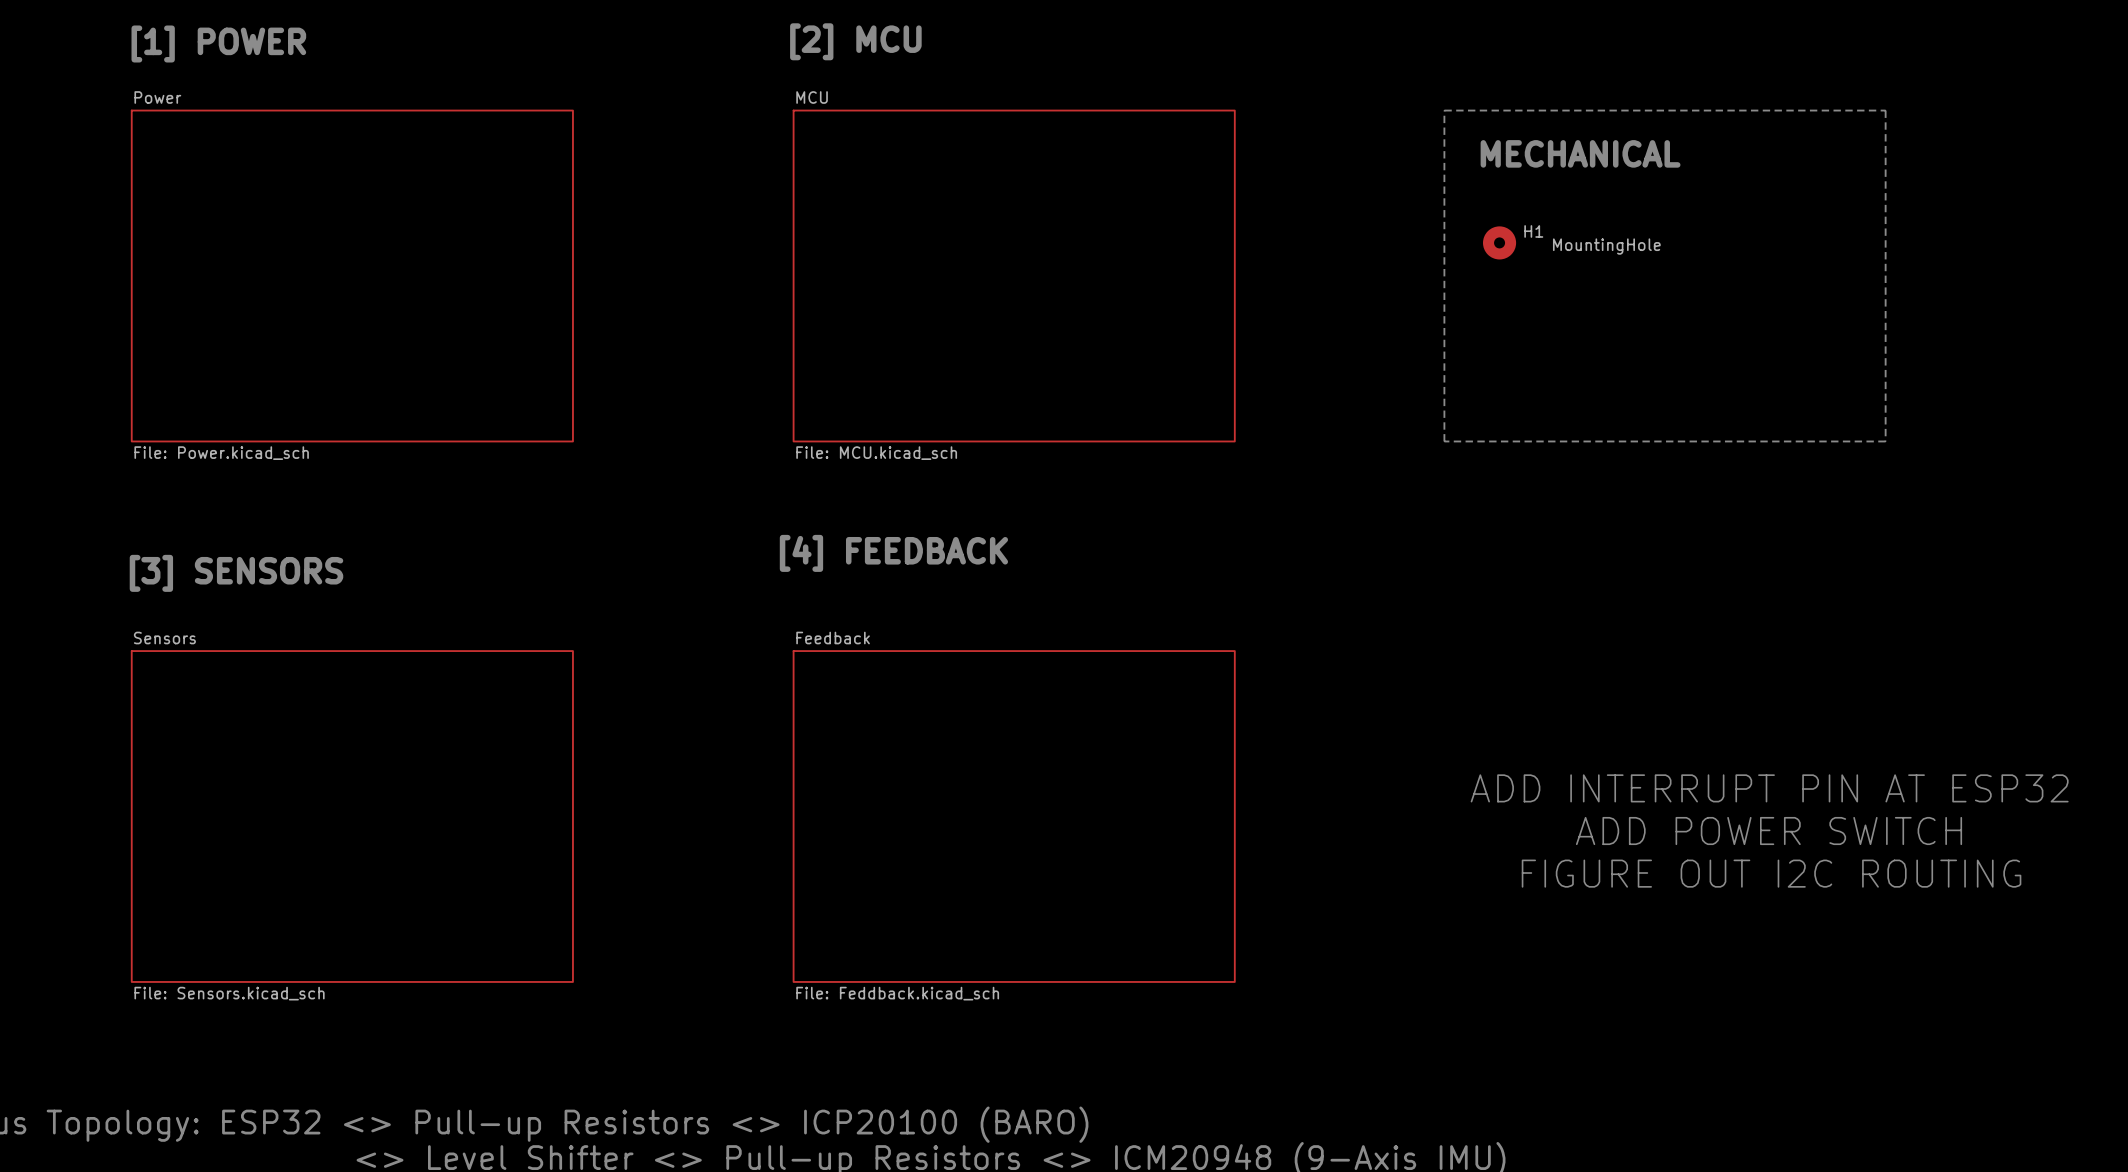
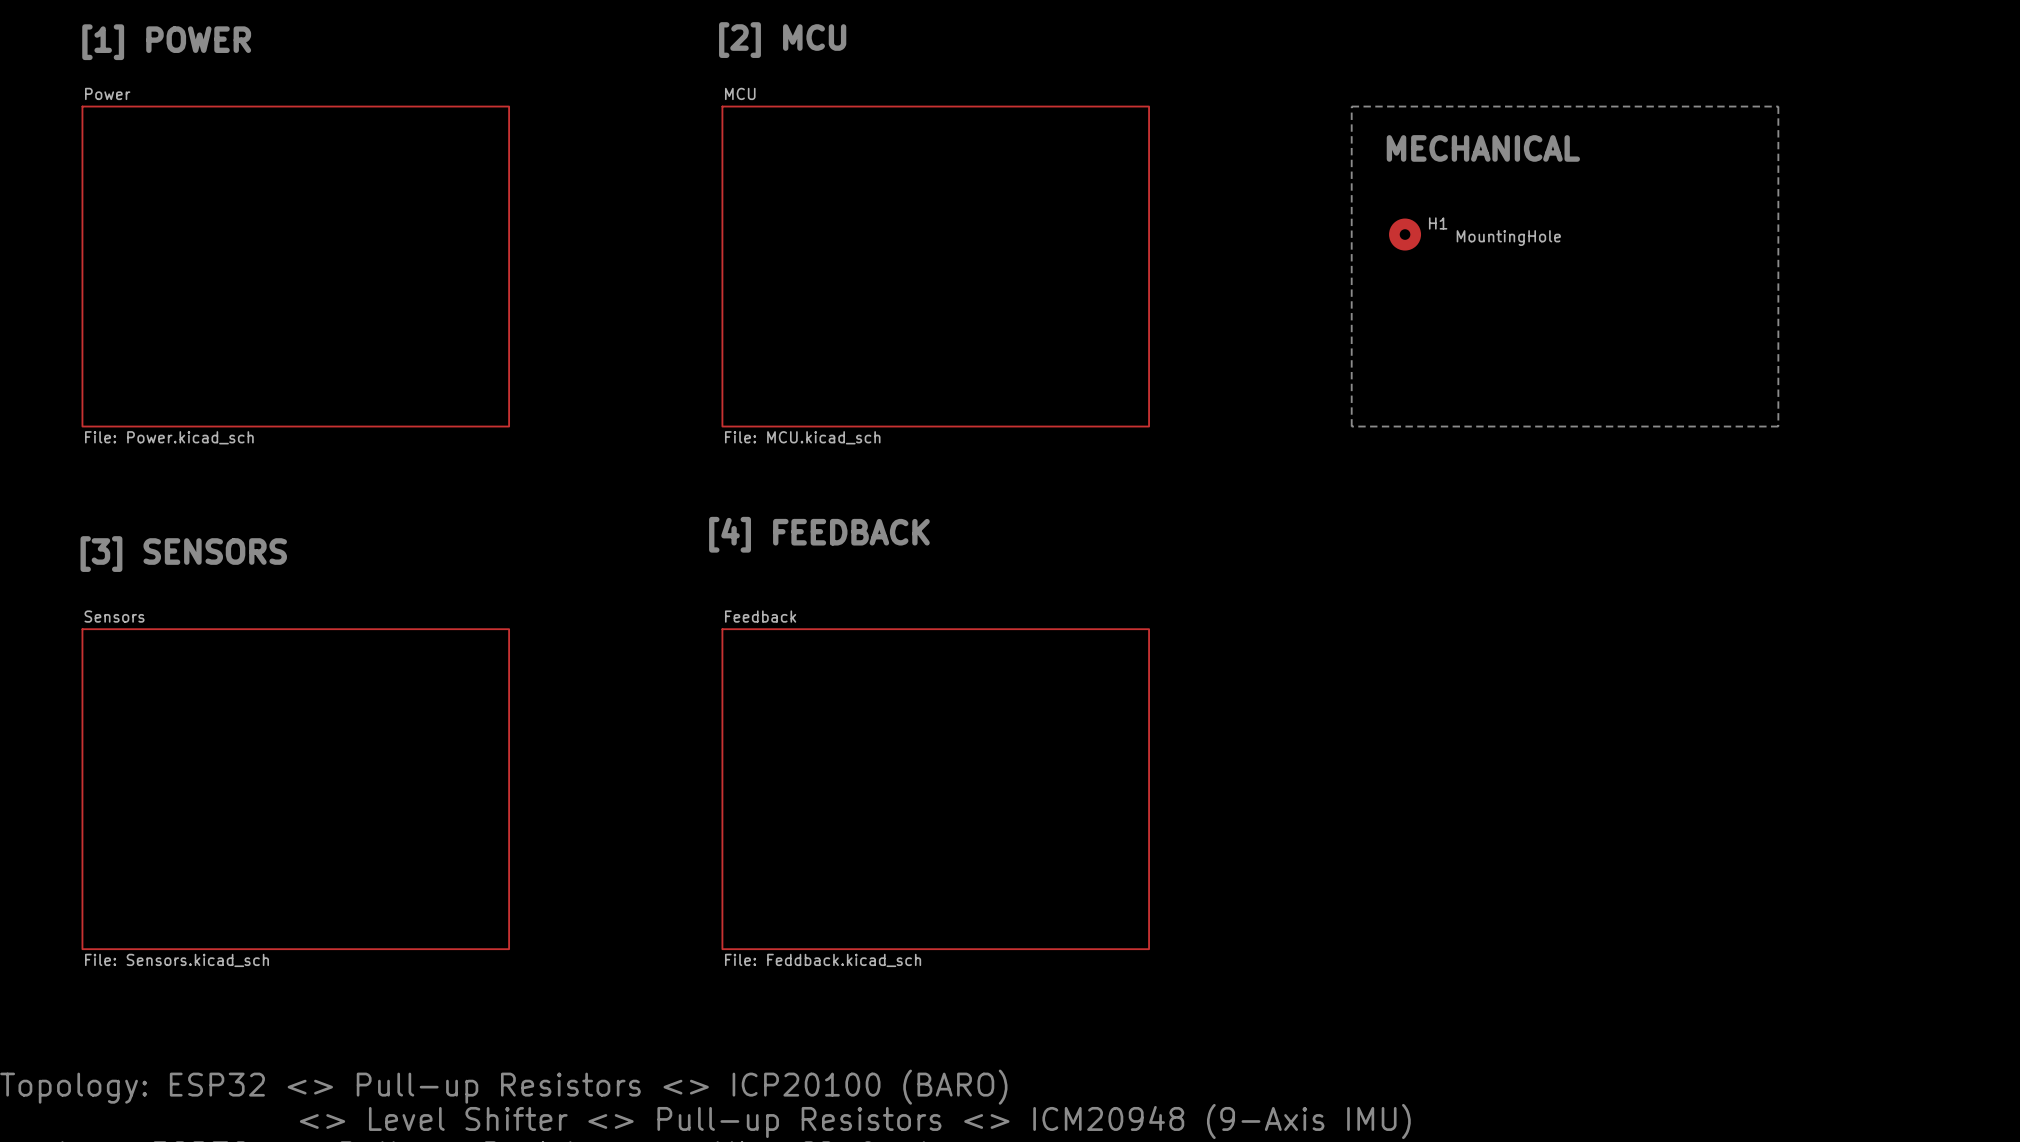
text: ADD INTERRUPT PIN AT ESP32 (1769, 788) -> none
text: ADD POWER SWITCH (1769, 831) -> none
text: FIGURE OUT I2C ROUTING (1771, 873) -> none

